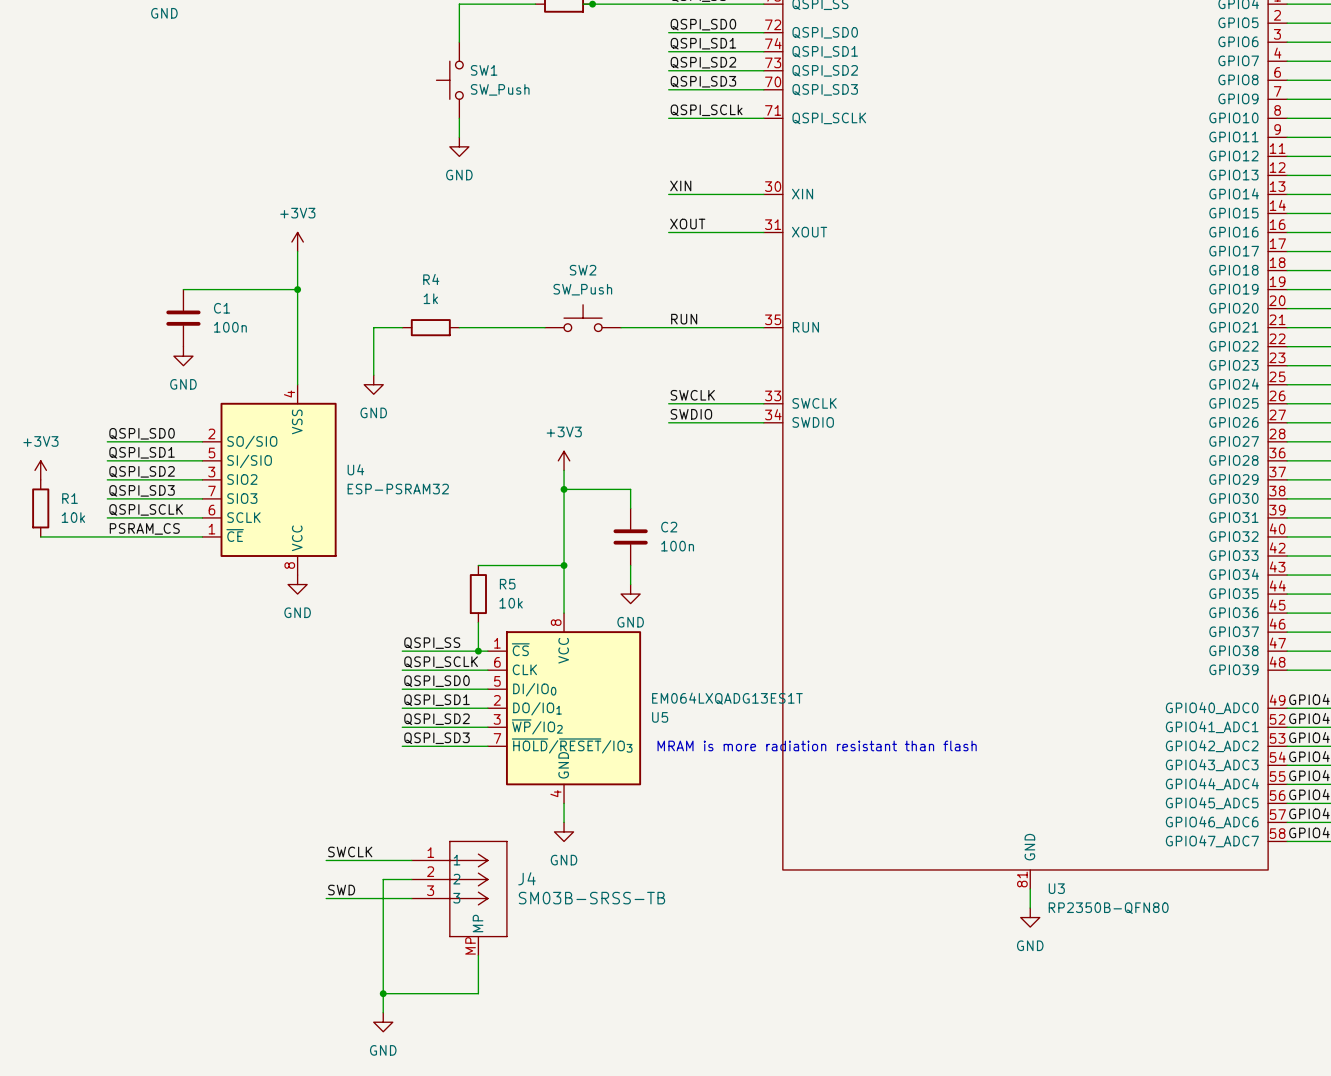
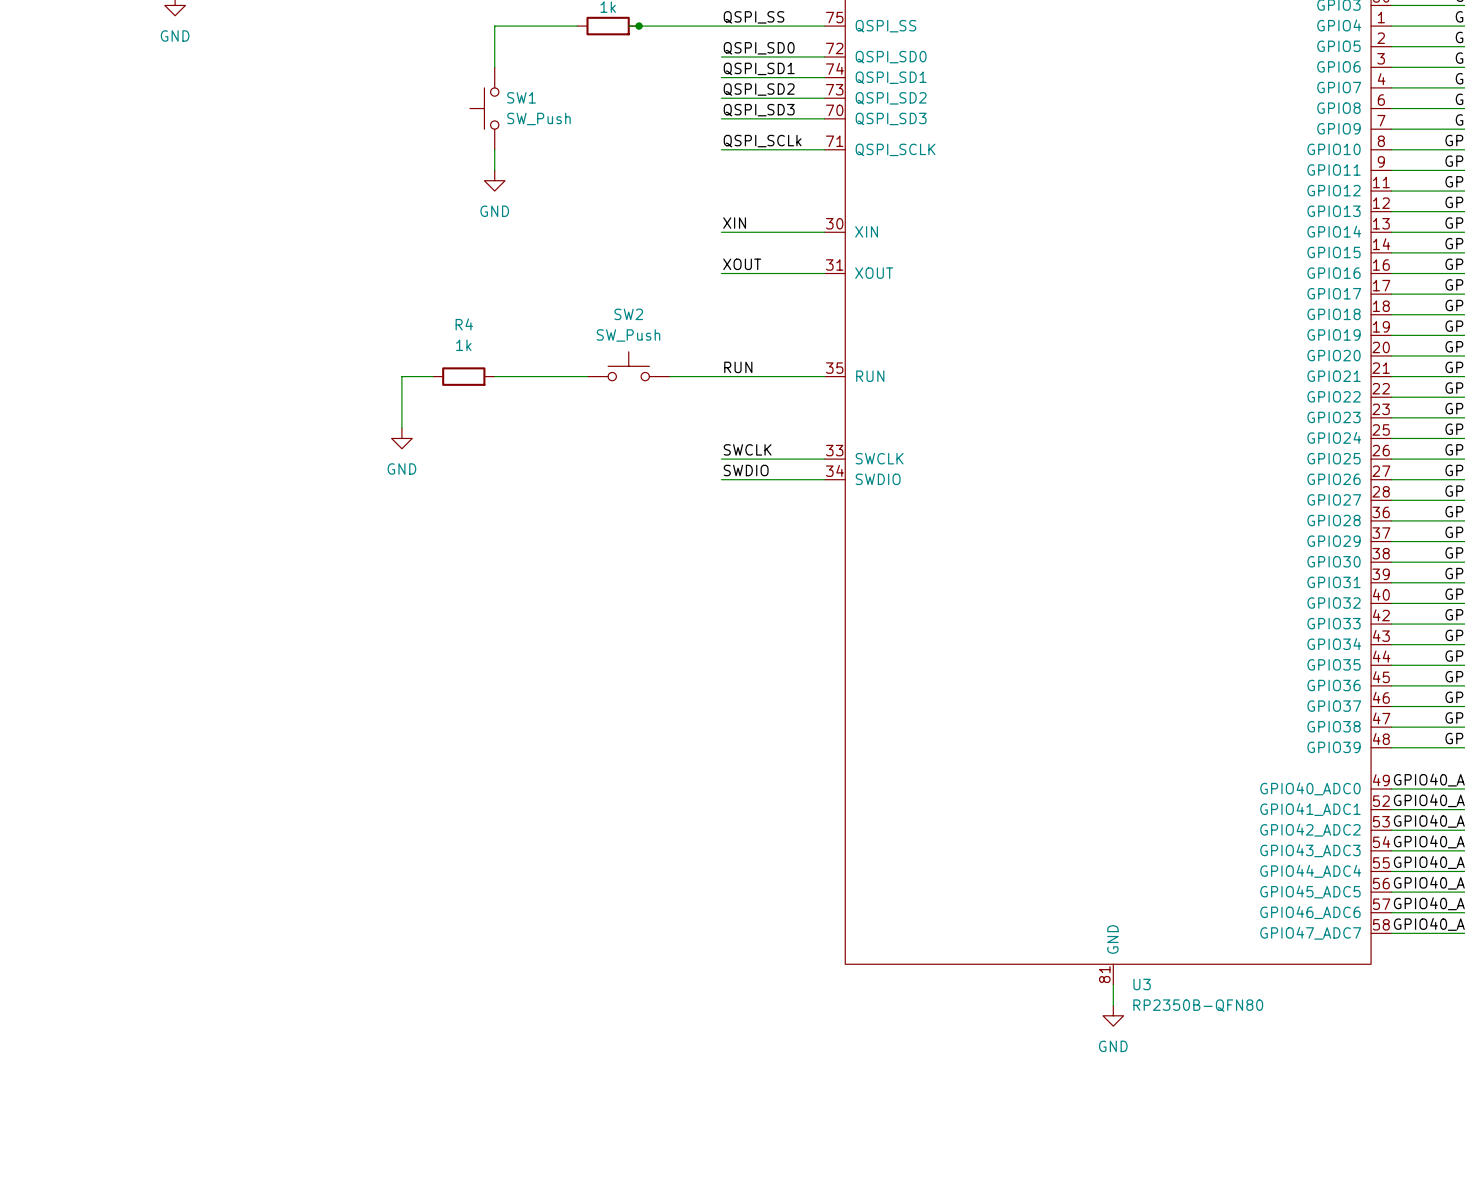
power symbol: +3V3 (297, 242) -> none
wire: (297, 251) (297, 384) -> none
wire: (183, 289) (297, 289) -> none
junction: (297, 289) -> none
C1: 100n (183, 318) -> none
power symbol: GND (183, 356) -> none
label: QSPI_SD0 (142, 433) -> none
wire: (107, 441) (202, 441) -> none
label: QSPI_SD1 (142, 452) -> none
wire: (107, 460) (202, 460) -> none
power symbol: +3V3 (564, 460) -> none
power symbol: +3V3 (40, 470) -> none
wire: (564, 470) (564, 613) -> none
label: QSPI_SD2 (142, 471) -> none
wire: (107, 479) (202, 479) -> none
U4: ESP-PSRAM32 (269, 479) -> none
wire: (564, 489) (630, 489) (630, 508) -> none
junction: (564, 489) -> none
label: QSPI_SD3 (142, 490) -> none
wire: (107, 498) (202, 498) -> none
R1: 10k (40, 508) -> none
label: QSPI_SCLK (146, 509) -> none
wire: (107, 517) (202, 517) -> none
label: PSRAM_CS (144, 528) -> none
wire: (40, 536) (202, 536) -> none
C2: 100n (630, 536) -> none
wire: (478, 565) (564, 565) -> none
junction: (564, 565) -> none
wire: (630, 565) (630, 584) -> none
power symbol: GND (297, 584) -> none
R5: 10k (478, 594) -> none
power symbol: GND (630, 594) -> none
wire: (478, 622) (478, 651) -> none
label: QSPI_SS (432, 643) -> none
wire: (402, 651) (487, 651) -> none
junction: (478, 651) -> none
label: QSPI_SCLK (441, 662) -> none
wire: (402, 670) (487, 670) -> none
label: QSPI_SD0 (437, 681) -> none
wire: (402, 689) (487, 689) -> none
label: QSPI_SD1 (437, 700) -> none
wire: (402, 708) (487, 708) -> none
U5: EM064LXQADG13ES1T (564, 708) -> none
label: QSPI_SD2 (437, 719) -> none
wire: (402, 727) (487, 727) -> none
label: QSPI_SD3 (437, 738) -> none
text: MRAM is more radiation resistant than flash (817, 745) -> none
wire: (402, 746) (487, 746) -> none
wire: (564, 803) (564, 822) -> none
power symbol: GND (564, 831) -> none
label: SWCLK (350, 851) -> none
wire: (326, 860) (411, 860) -> none
wire: (411, 879) (383, 879) (383, 1012) -> none
label: SWD (341, 890) -> none
wire: (326, 898) (411, 898) -> none
J4: SM03B-SRSS-TB (459, 898) -> none
wire: (478, 955) (478, 993) (383, 993) -> none
junction: (383, 993) -> none
power symbol: GND (383, 1022) -> none

